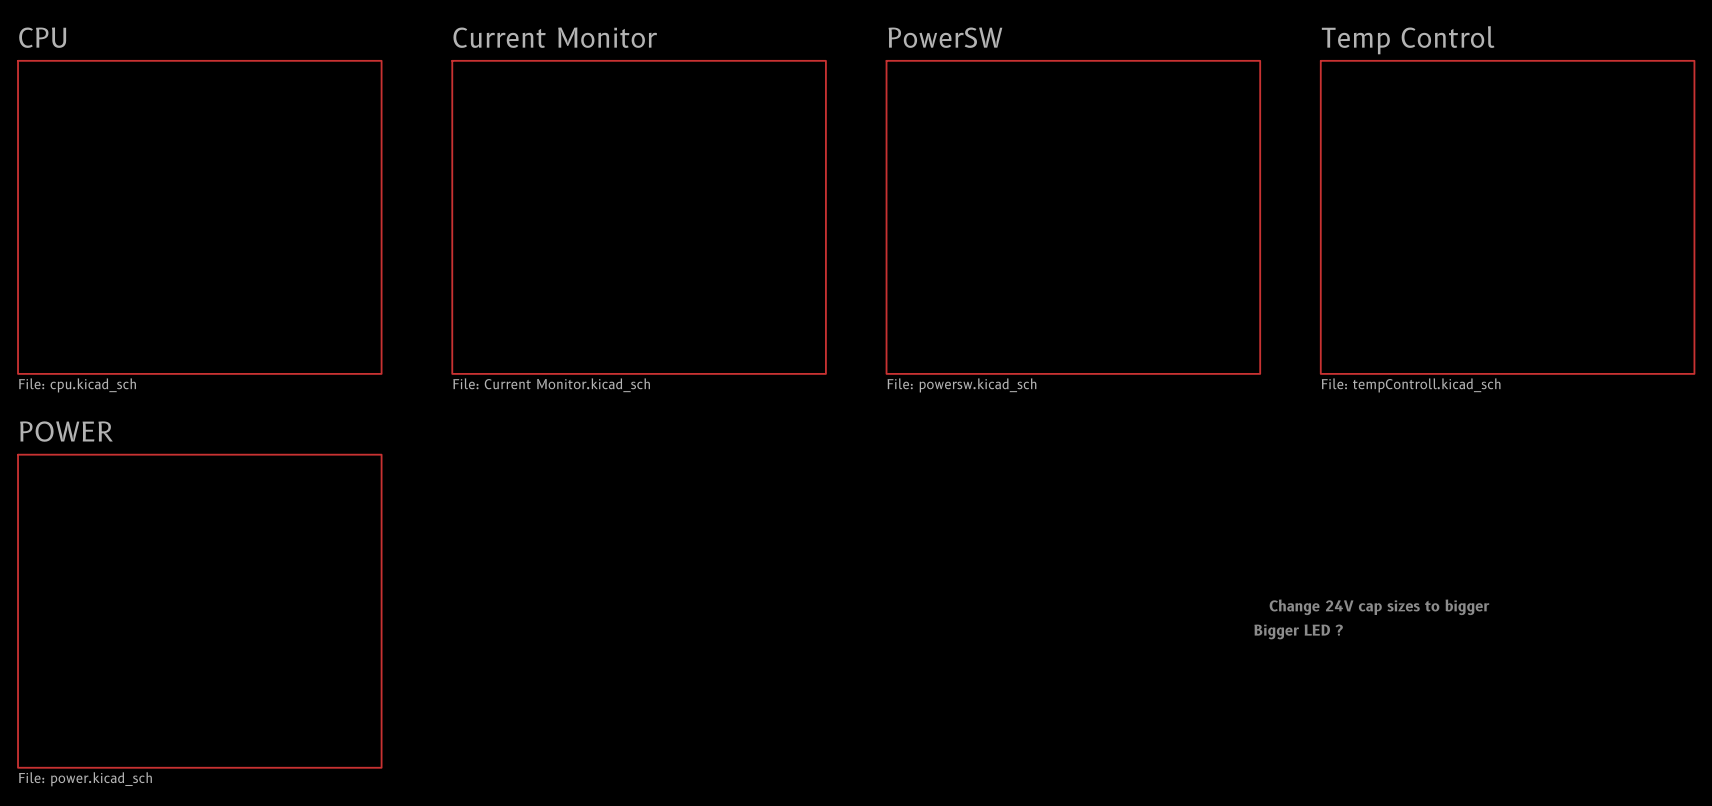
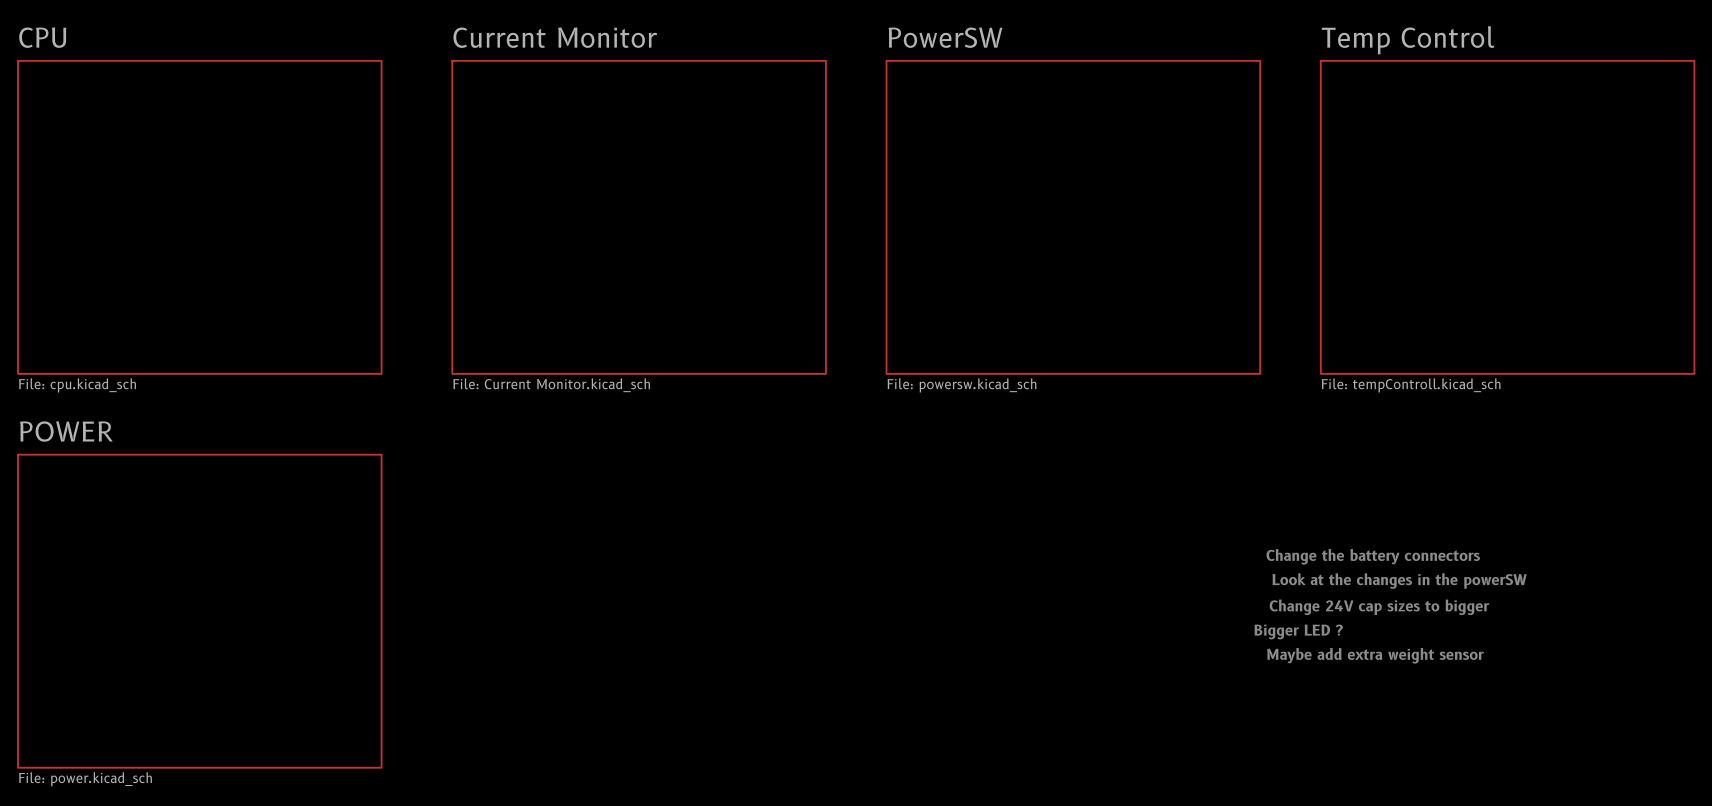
text: none -> Change the battery connectors (1373, 556)
text: none -> Look at the changes in the powerSW (1399, 581)
text: none -> Maybe add extra weight sensor (1375, 655)

